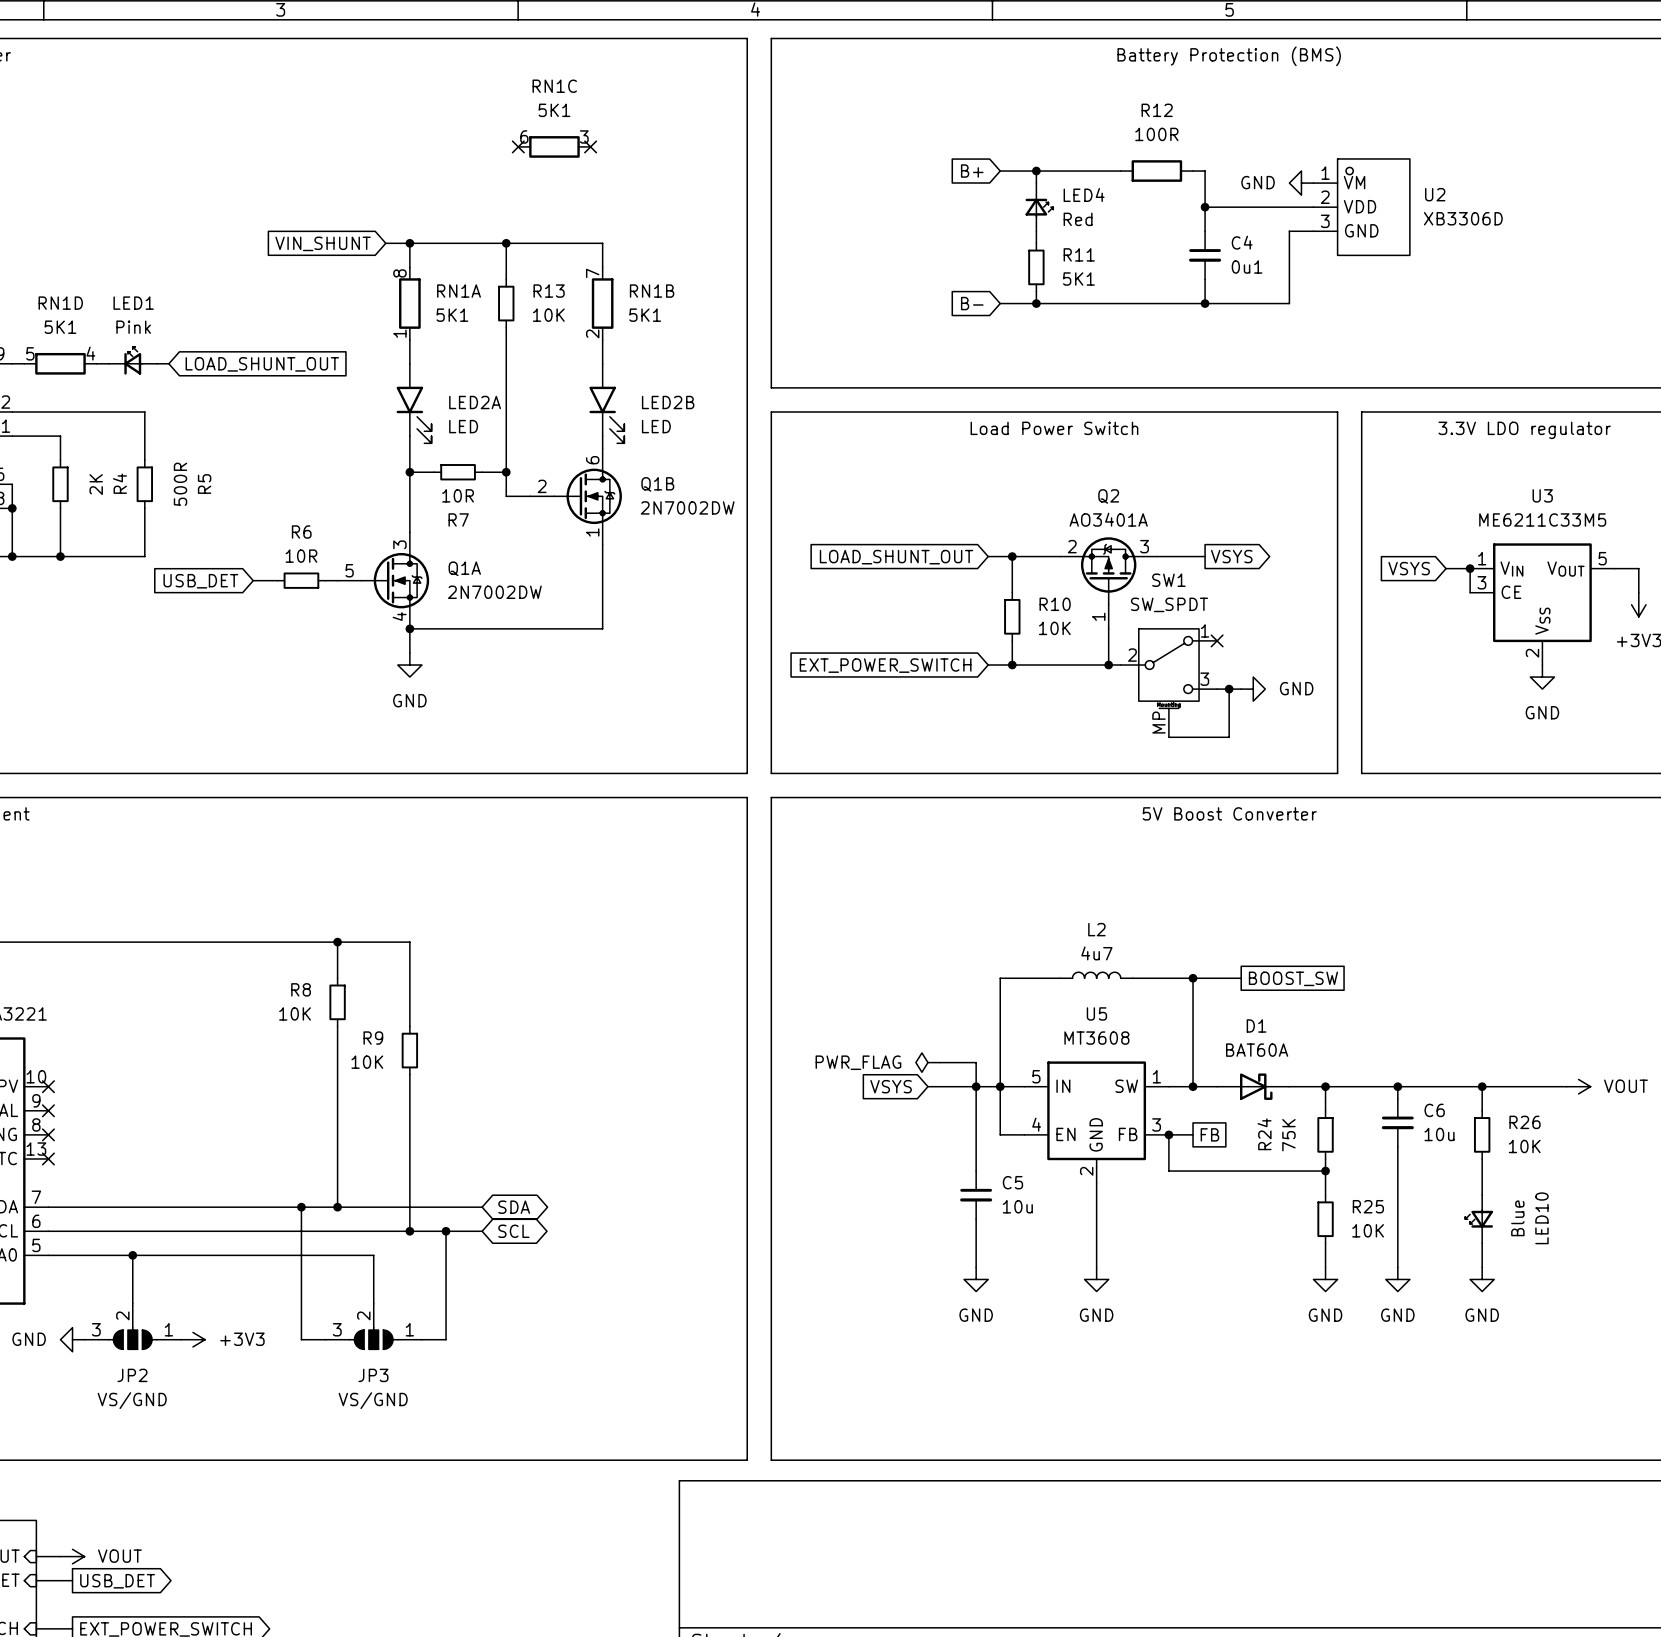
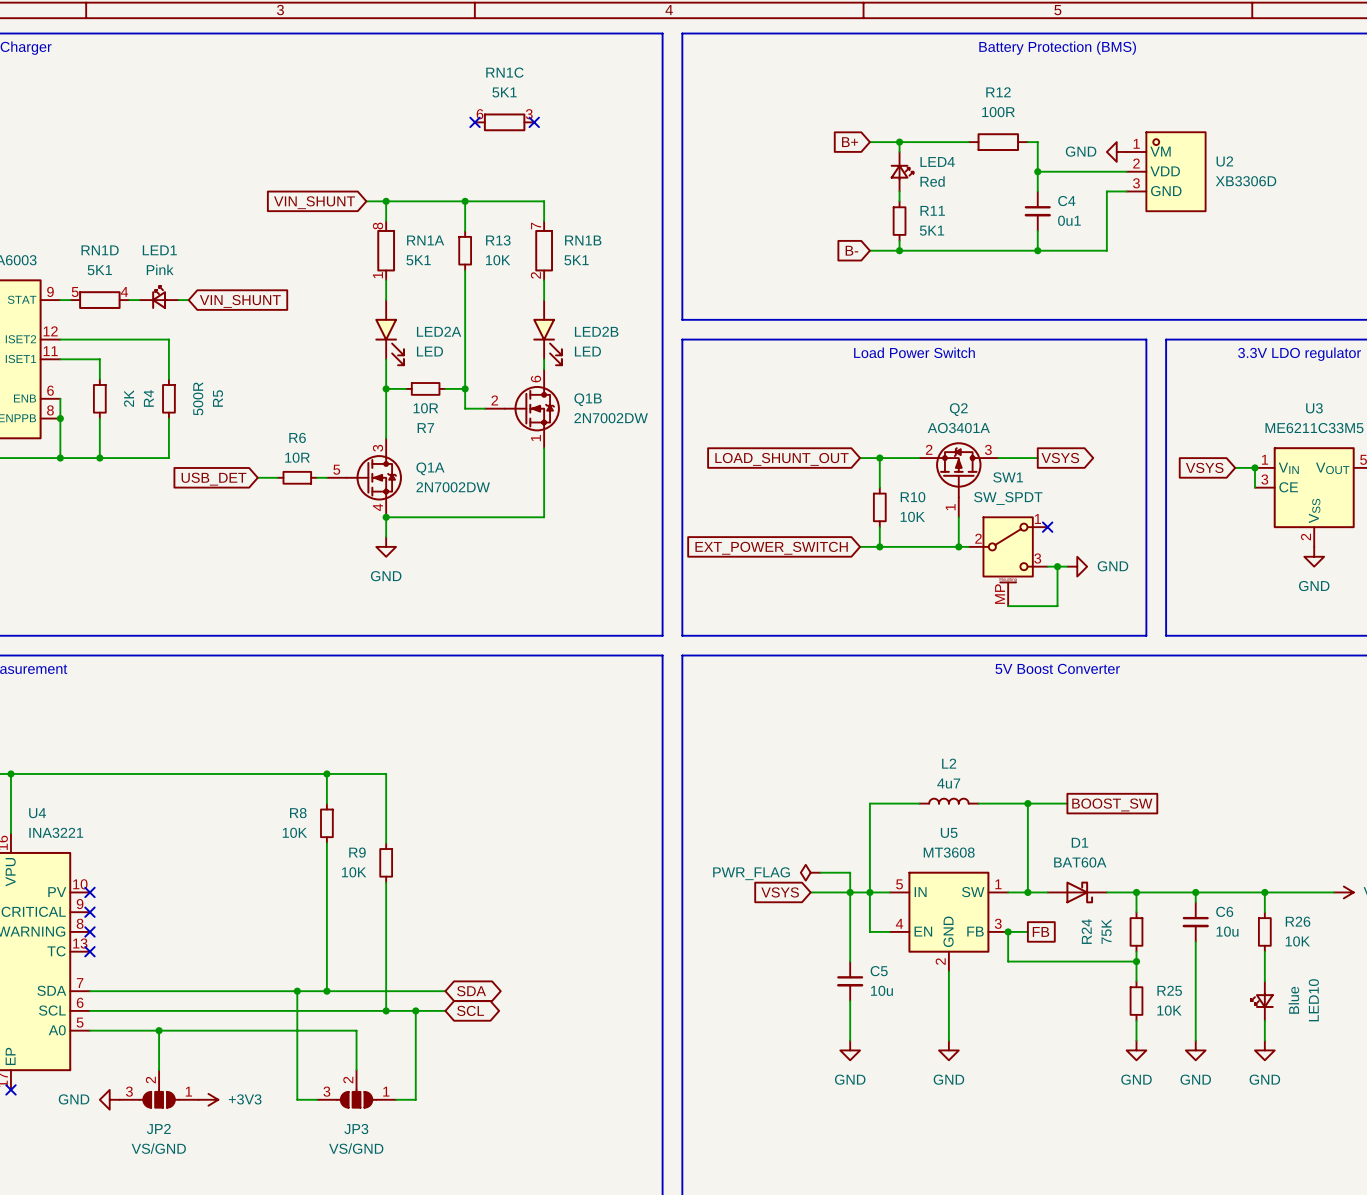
global label: LOAD_SHUNT_OUT (262, 364) -> VIN_SHUNT (240, 301)

